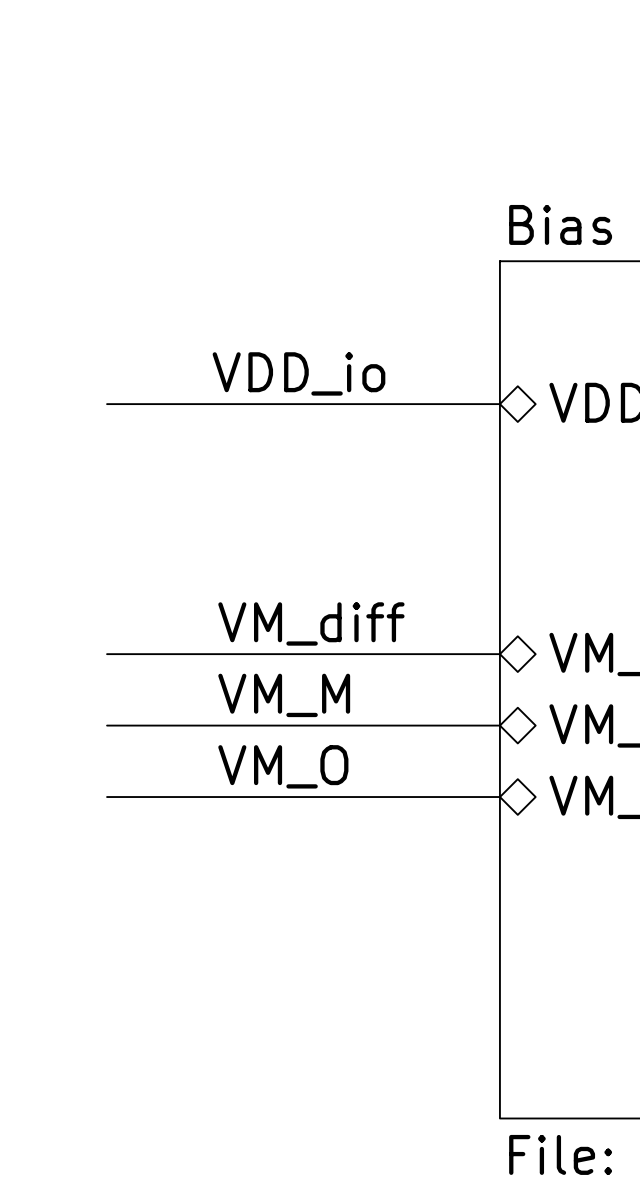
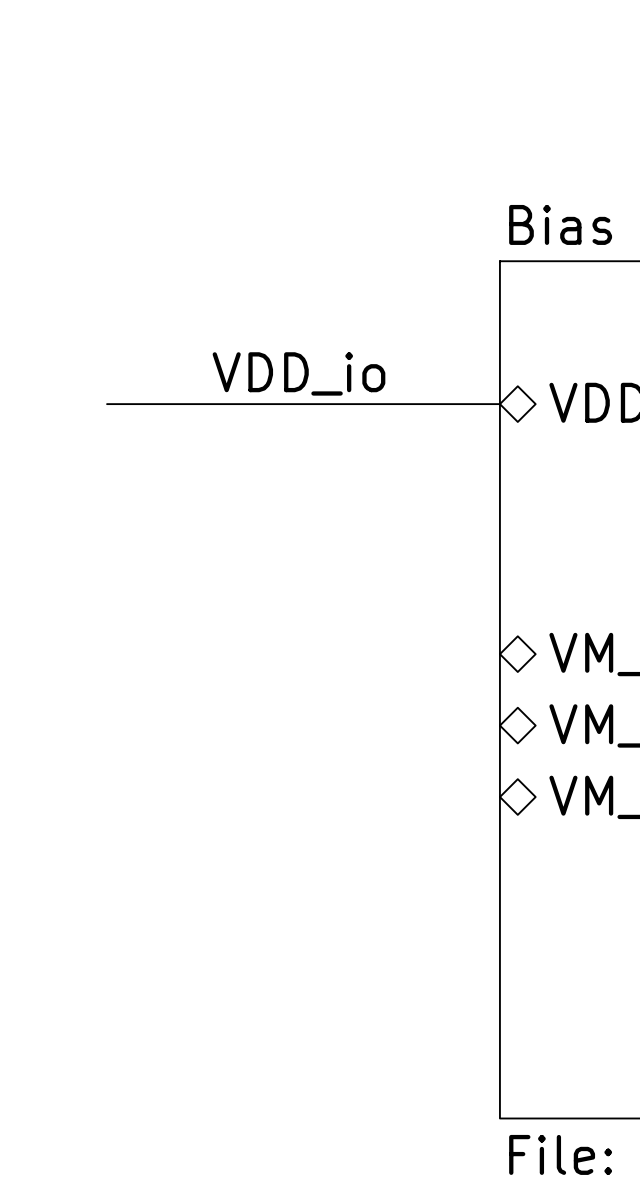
label: VM_diff (311, 623) -> none
wire: (107, 654) (499, 654) -> none
label: VM_M (284, 695) -> none
wire: (107, 725) (499, 725) -> none
label: VM_O (283, 766) -> none
wire: (107, 797) (499, 797) -> none

